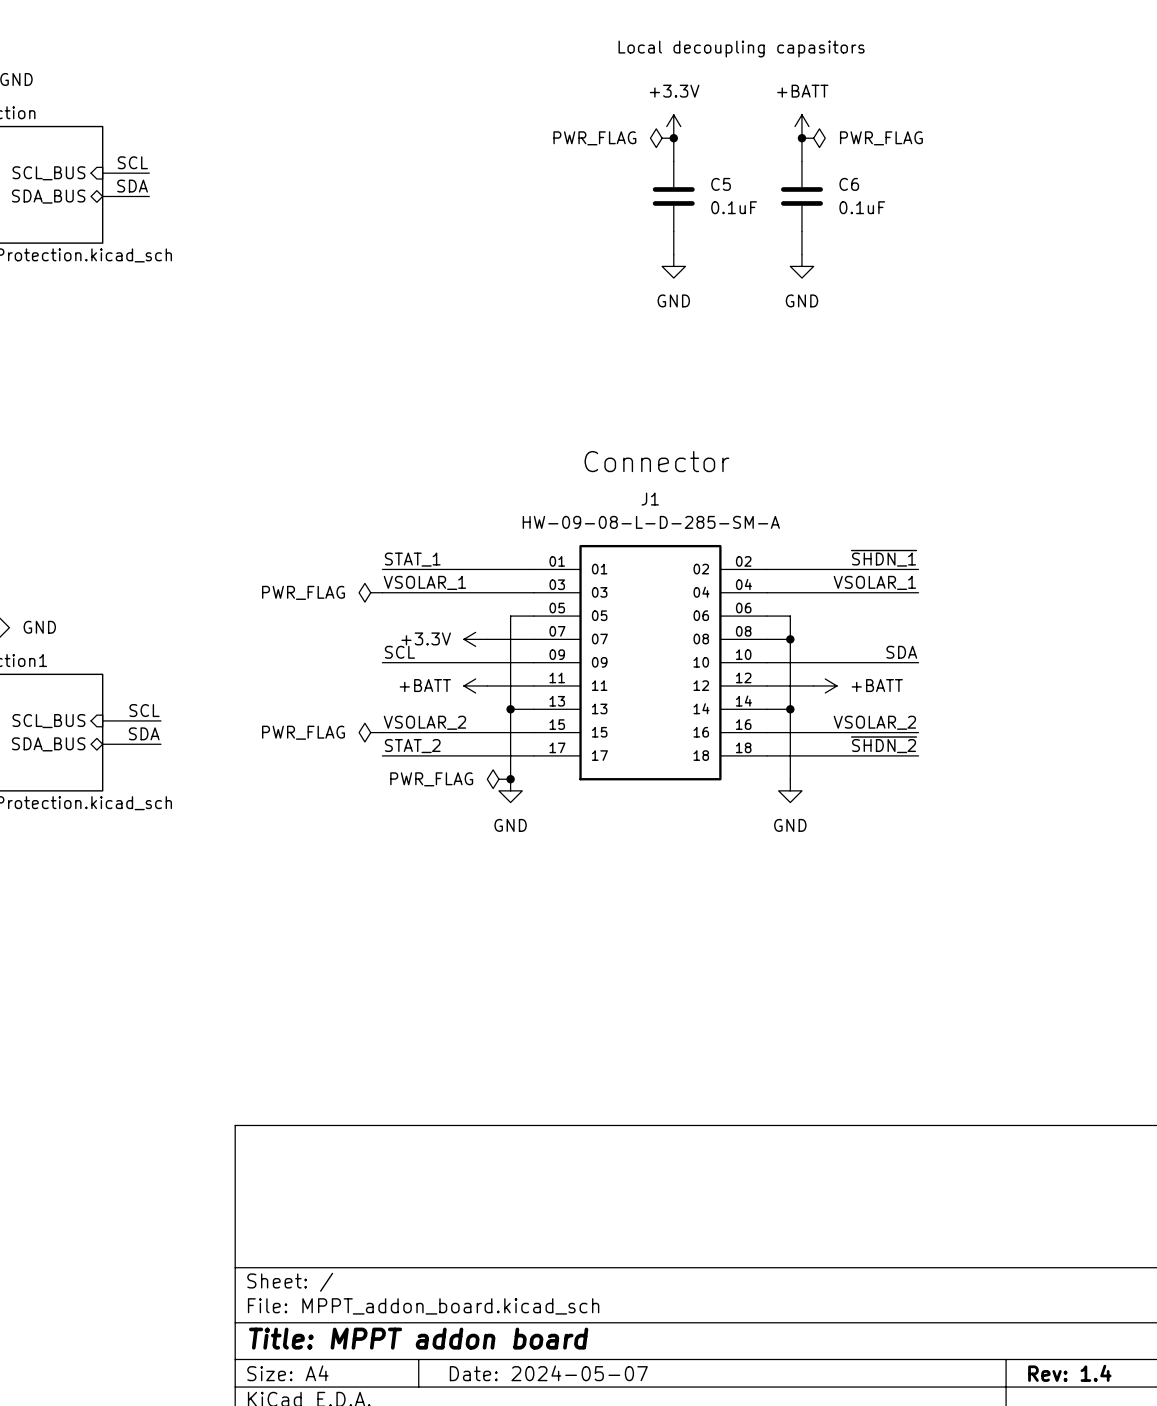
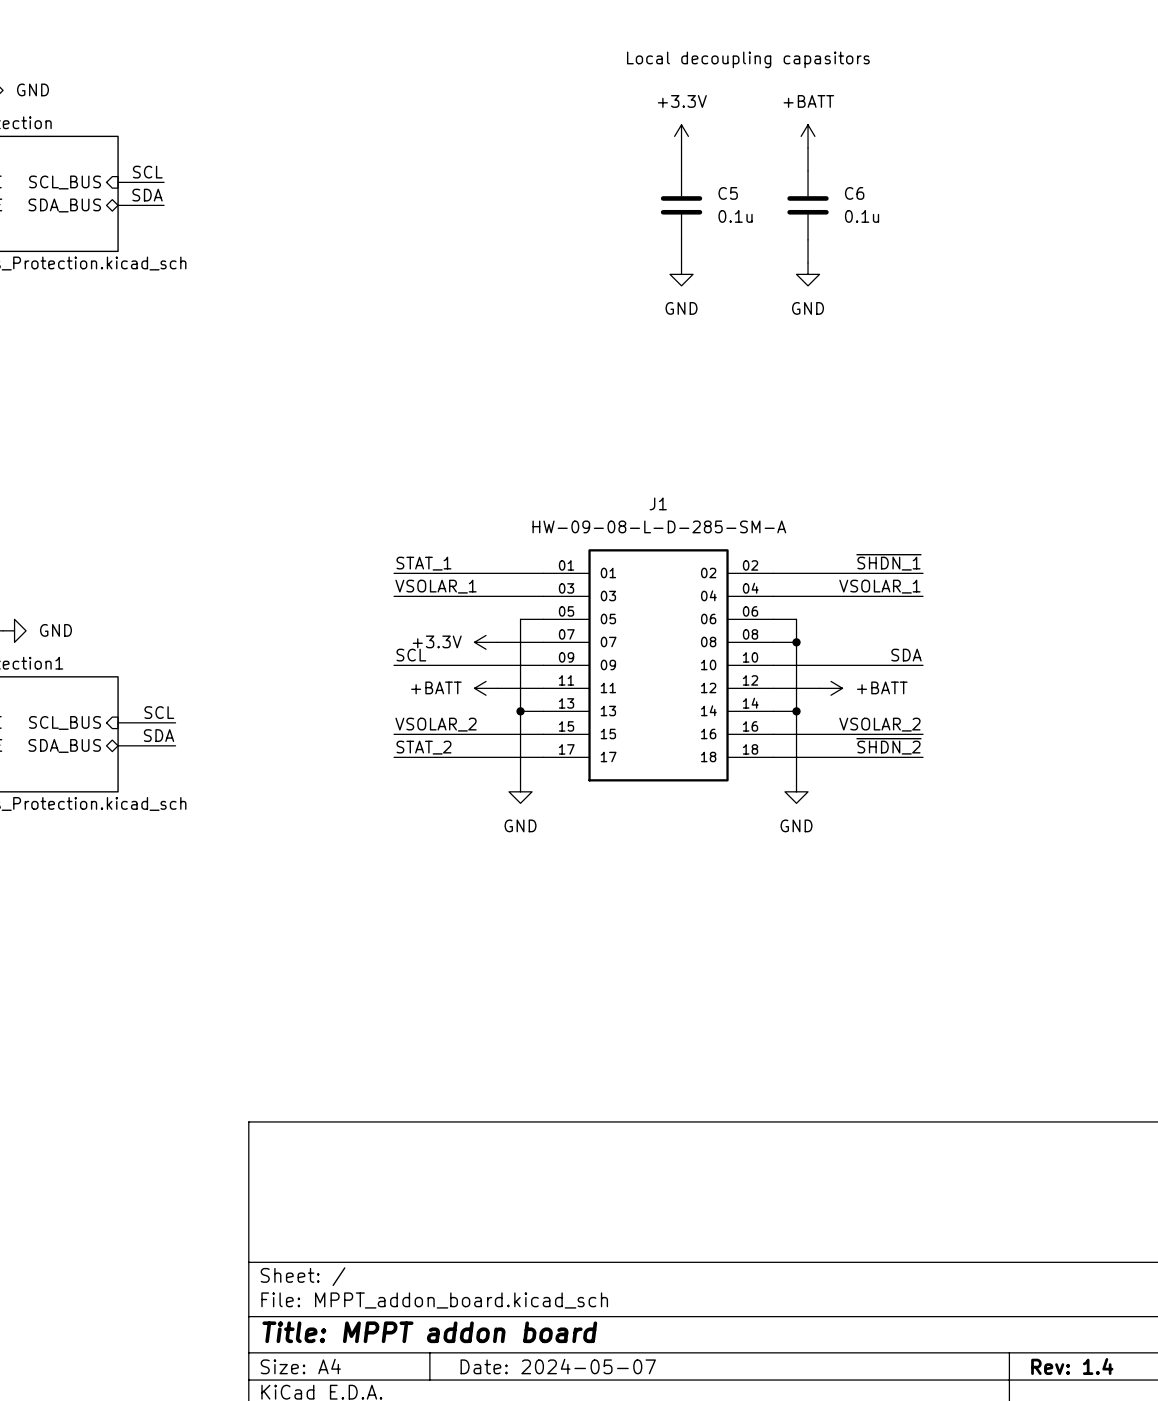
power symbol: PWR_FLAG (662, 138) -> none
junction: (673, 138) -> none
junction: (801, 138) -> none
power symbol: PWR_FLAG (813, 138) -> none
C5 value: 0.1uF (734, 207) -> 0.1u (735, 216)
C6 value: 0.1uF (862, 207) -> 0.1u (862, 216)
text: Connector (656, 461) -> none
power symbol: PWR_FLAG (370, 592) -> none
power symbol: PWR_FLAG (370, 732) -> none
power symbol: PWR_FLAG (498, 779) -> none
junction: (510, 779) -> none

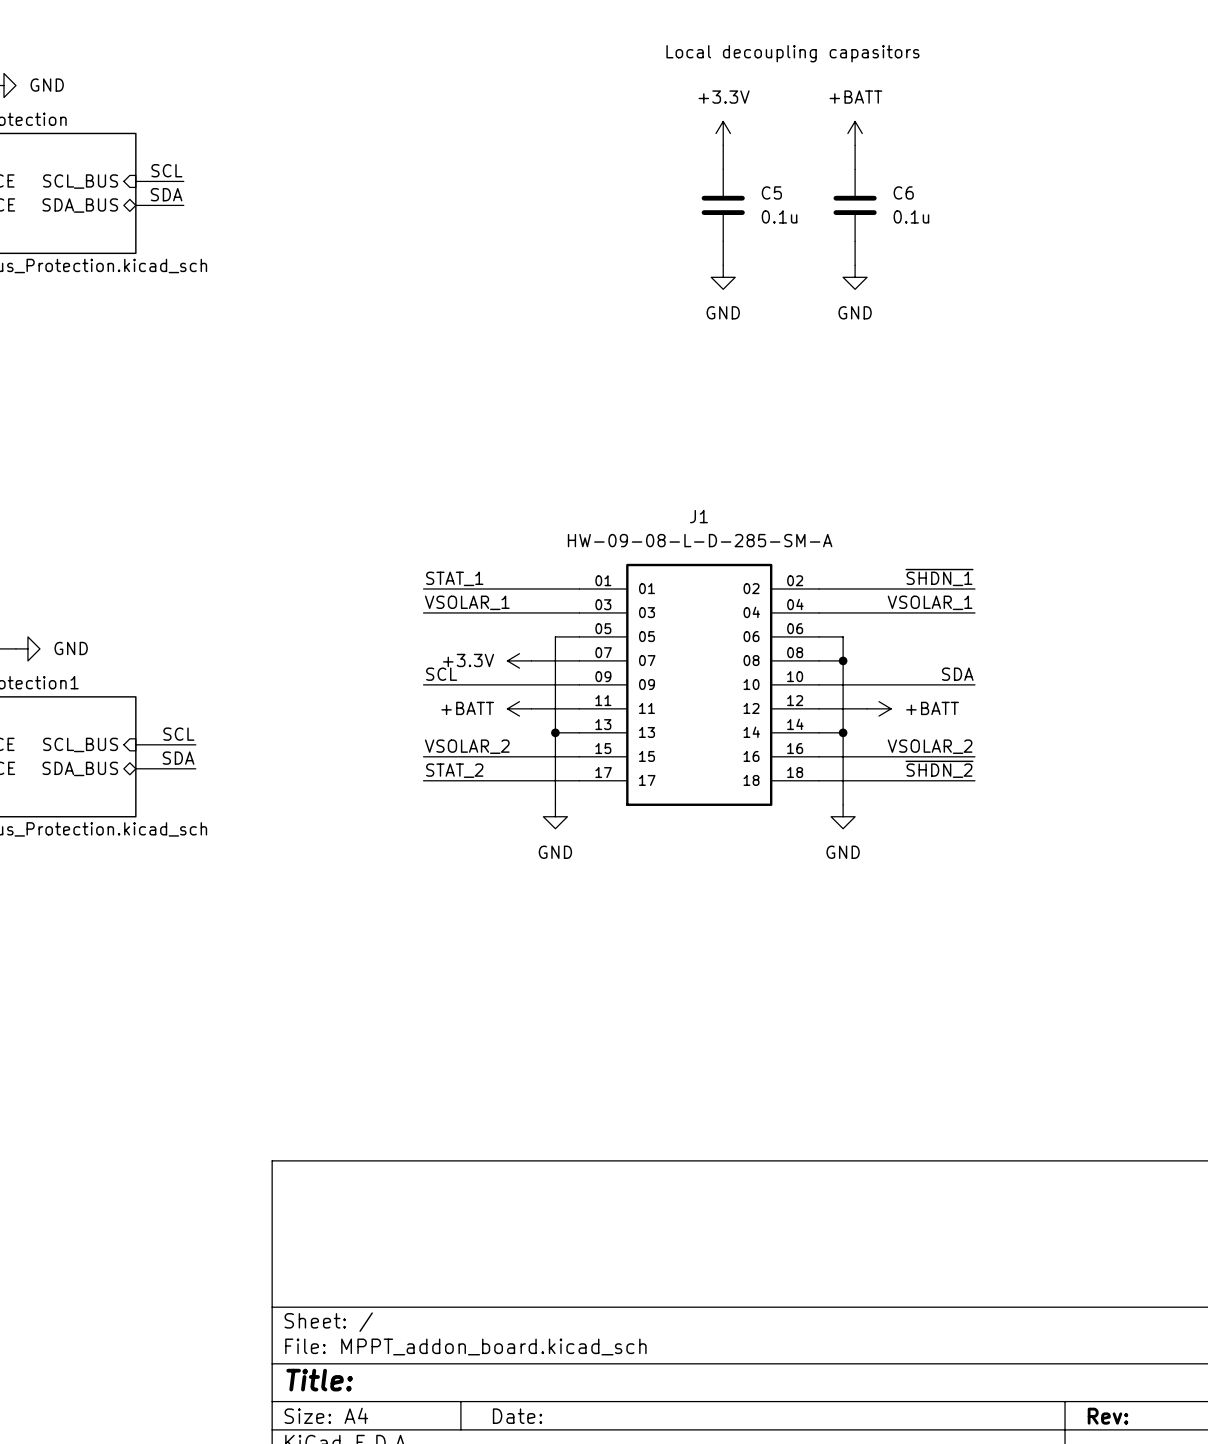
title block: Title: MPPT addon board (429, 1332) -> Title: (319, 1380)
title block: Date: 2024-05-07 (558, 1366) -> Date: (517, 1416)
title block: Rev: 1.4 (1072, 1366) -> Rev: (1108, 1416)

